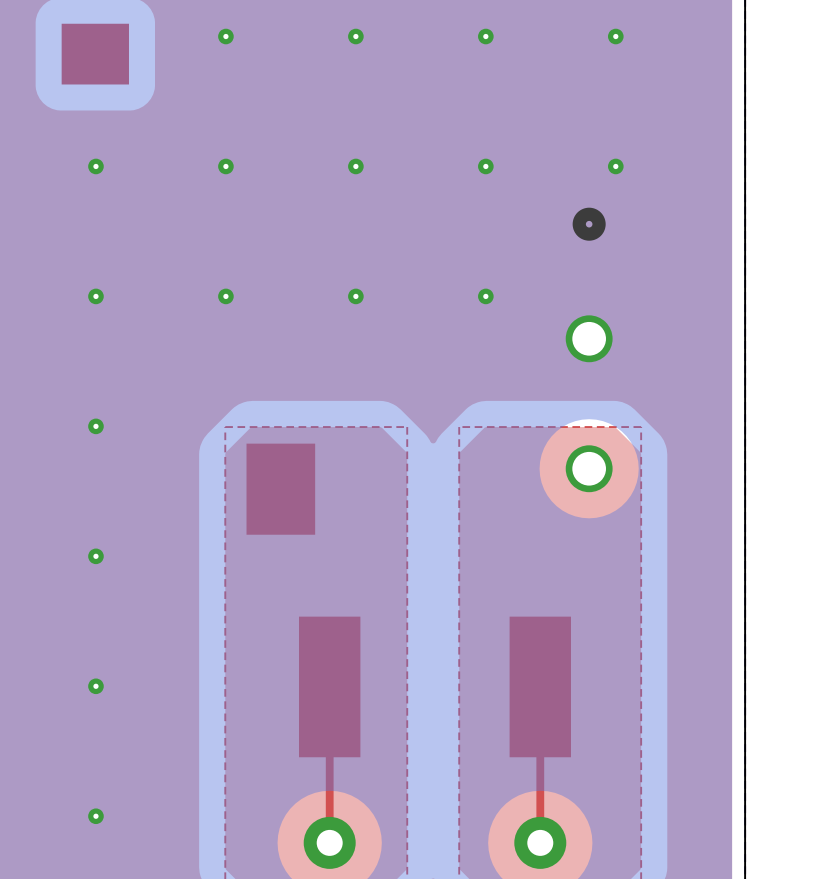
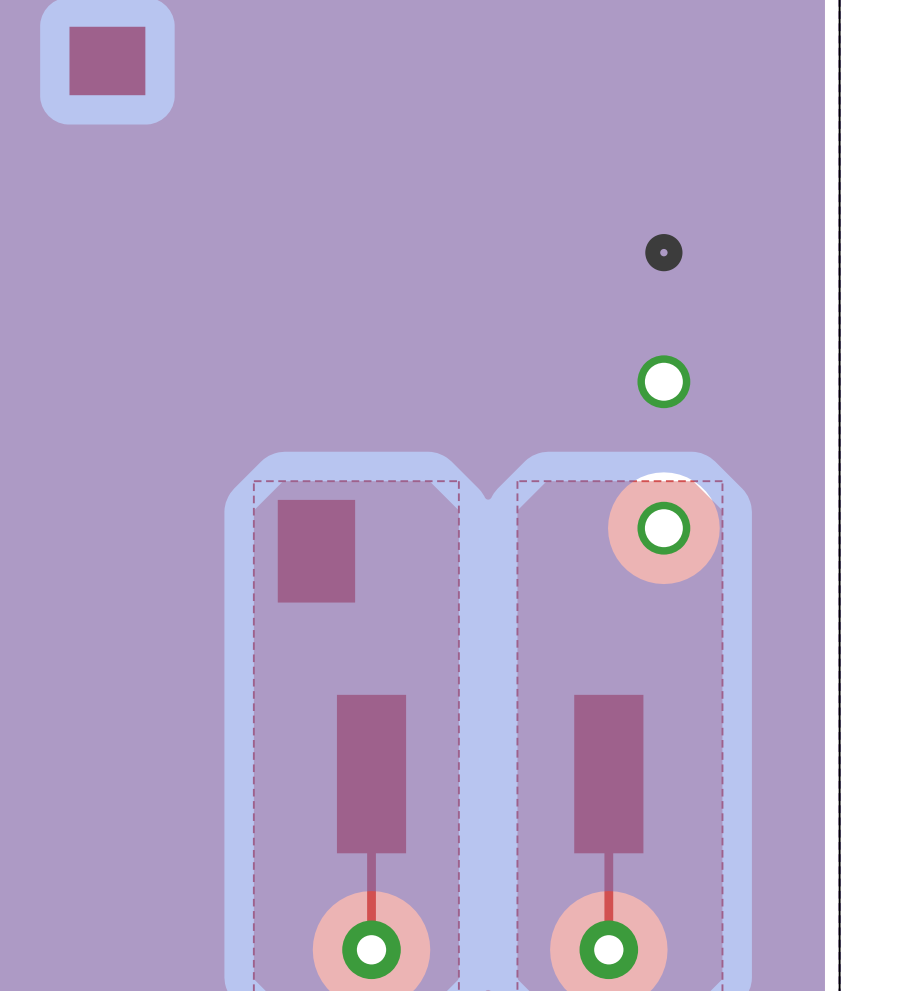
via: (225, 36) -> none
via: (355, 36) -> none
via: (485, 36) -> none
via: (615, 36) -> none
via: (95, 166) -> none
via: (225, 166) -> none
via: (355, 166) -> none
via: (485, 166) -> none
via: (615, 166) -> none
via: (95, 296) -> none
via: (225, 296) -> none
via: (355, 296) -> none
via: (485, 296) -> none
via: (95, 426) -> none
via: (95, 556) -> none
via: (95, 686) -> none
via: (95, 816) -> none

